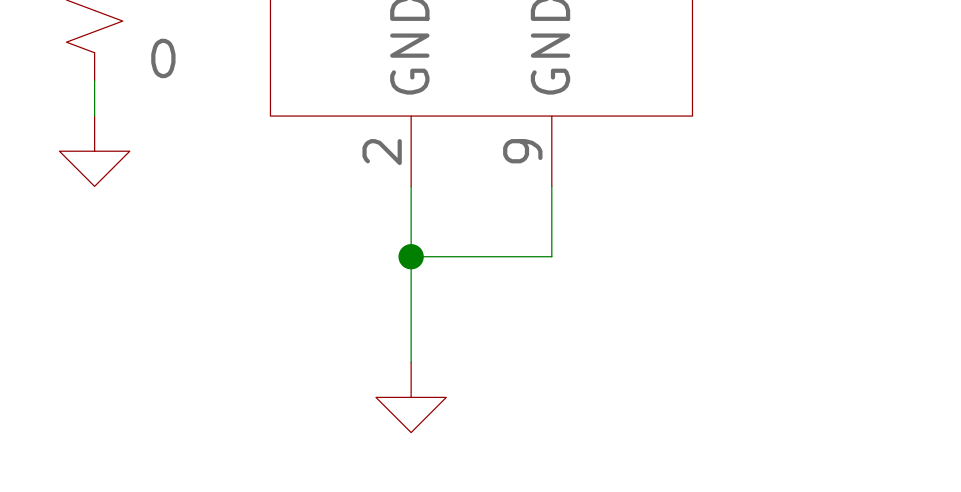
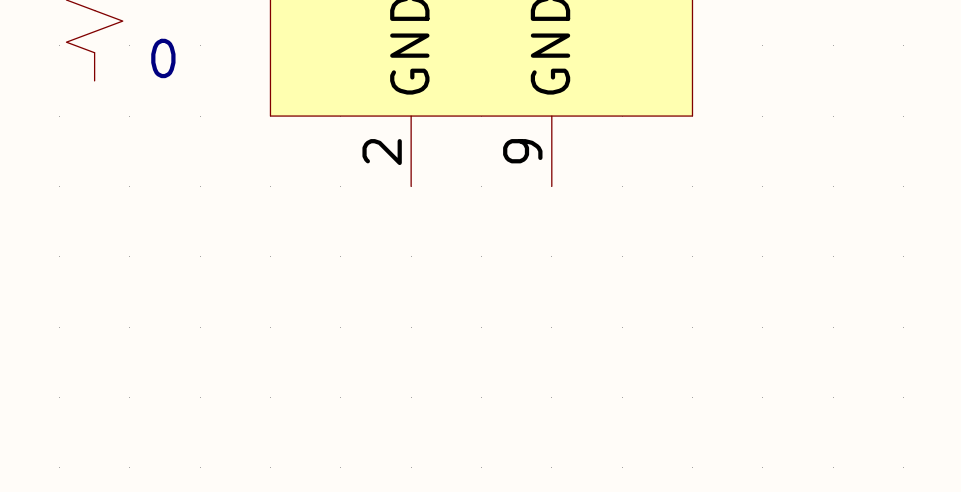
wire: (94, 80) (94, 116) -> none
power symbol: (94, 151) -> none
wire: (411, 186) (411, 362) -> none
wire: (551, 186) (551, 256) (411, 256) -> none
junction: (411, 256) -> none
power symbol: (411, 397) -> none

